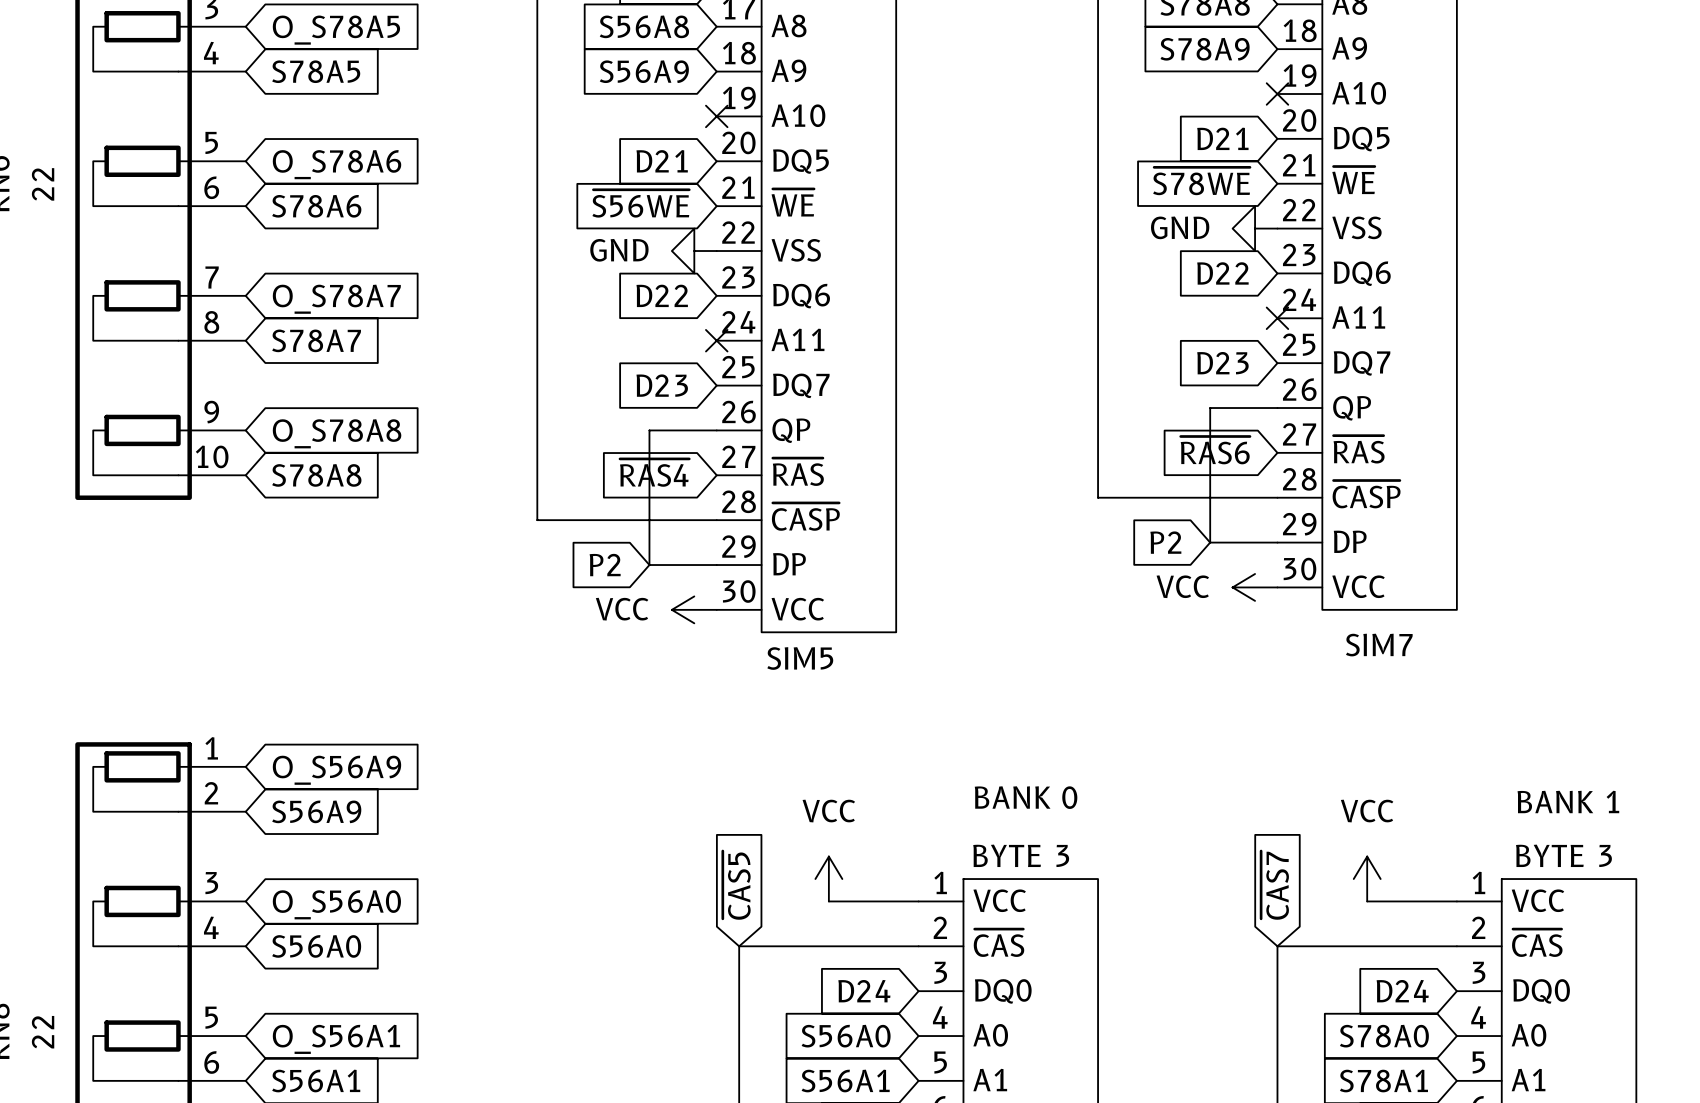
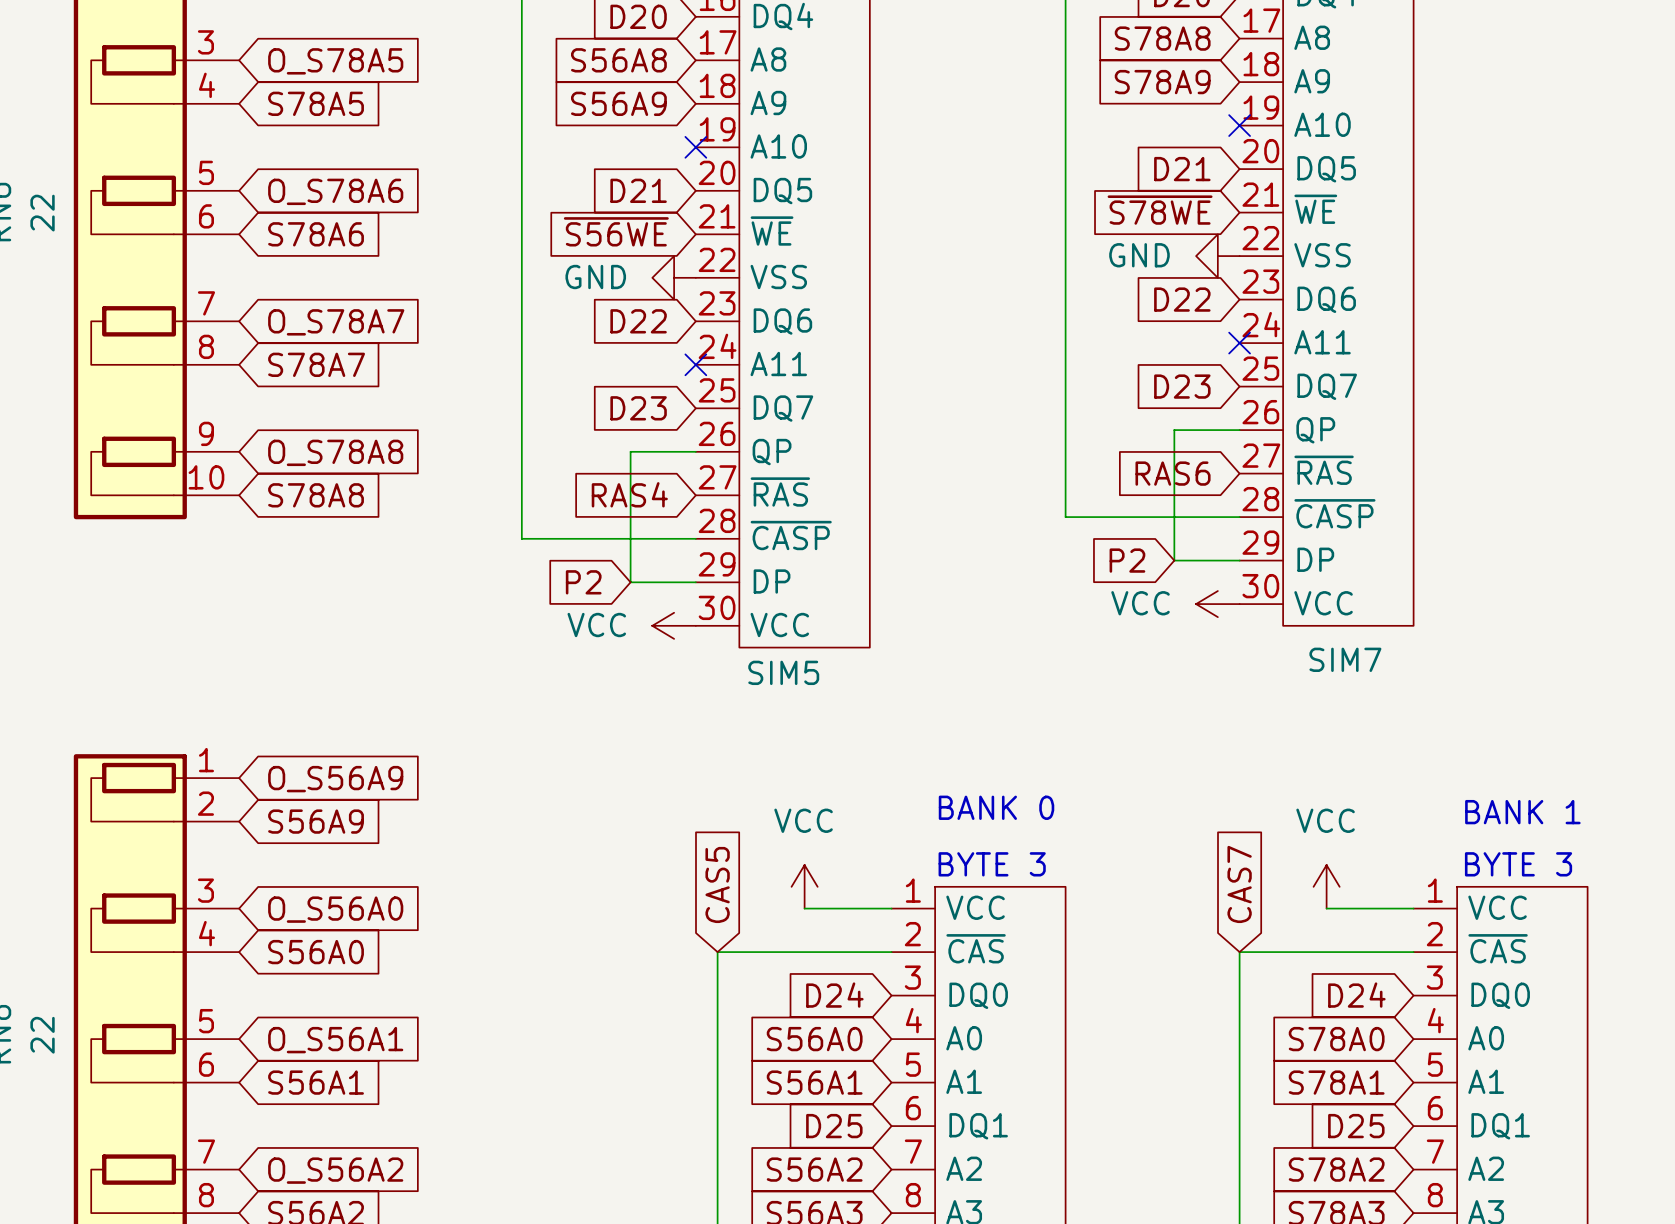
global label: ~{RAS6} (1215, 450) -> RAS6 (1173, 473)
global label: ~{RAS4} (654, 472) -> RAS4 (629, 494)
global label: ~{CAS5} (736, 885) -> CAS5 (717, 884)
global label: ~{CAS7} (1275, 885) -> CAS7 (1239, 884)

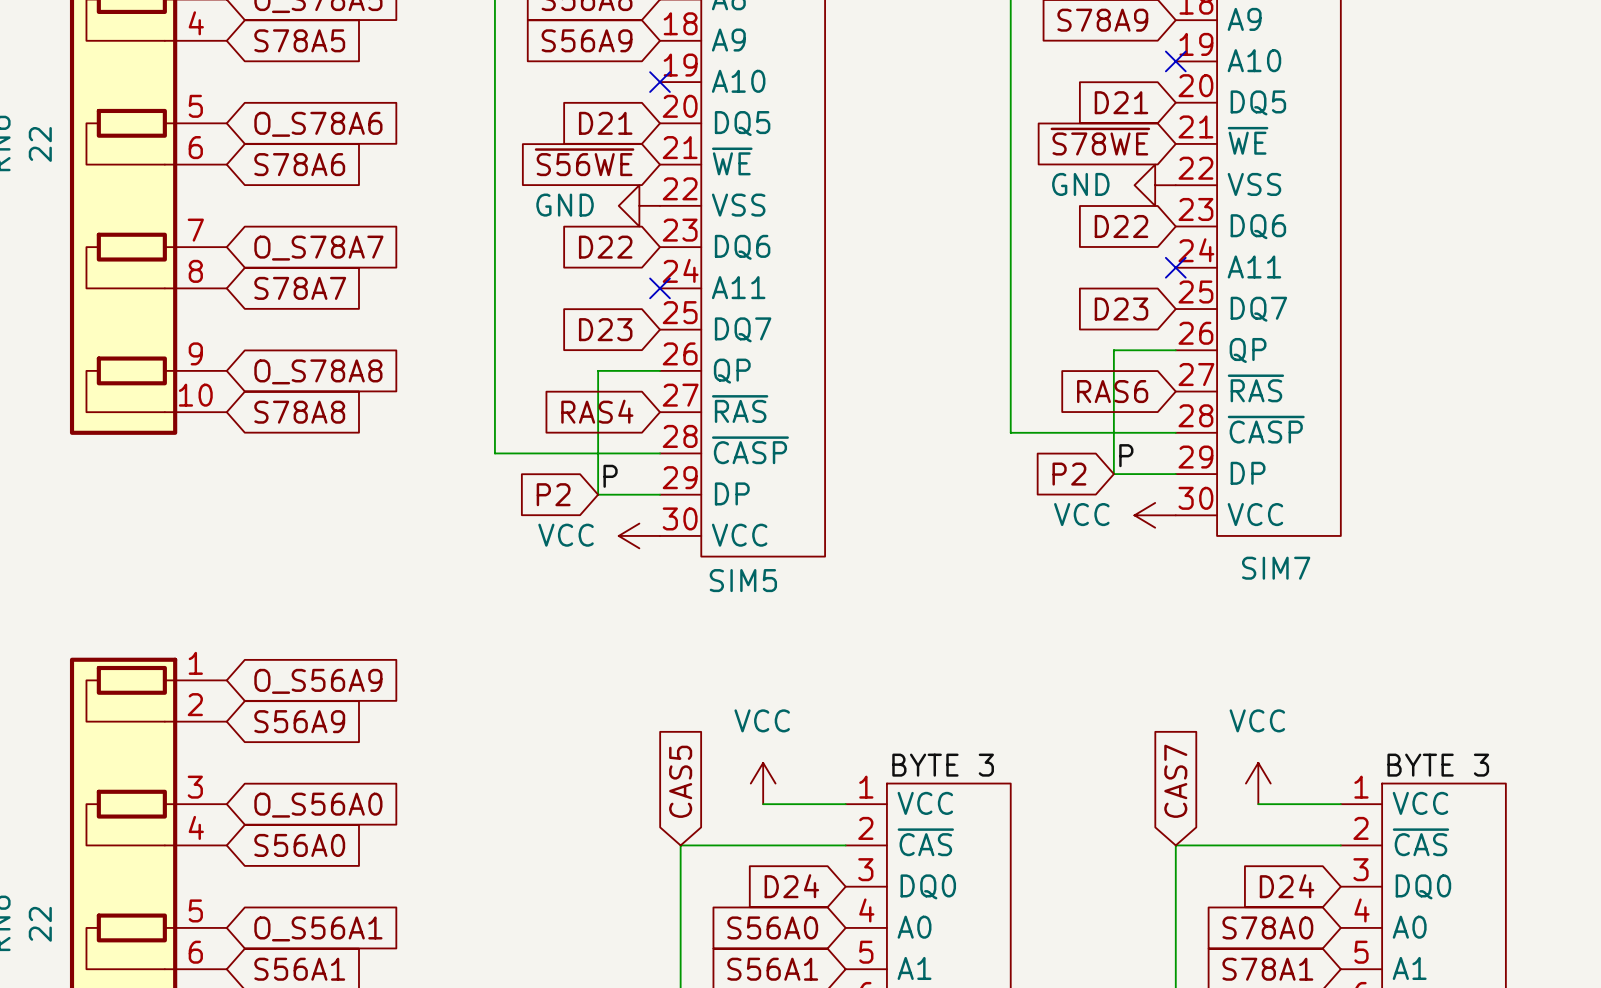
label: none -> P (1126, 455)
label: none -> P (610, 476)
text: BANK 0 (996, 807) -> none
text: BANK 1 (1522, 812) -> none
text: BYTE 3 (992, 864) -> none
text: BYTE 3 (1518, 864) -> none
label: none -> BYTE 3 (943, 765)
label: none -> BYTE 3 (1438, 765)

